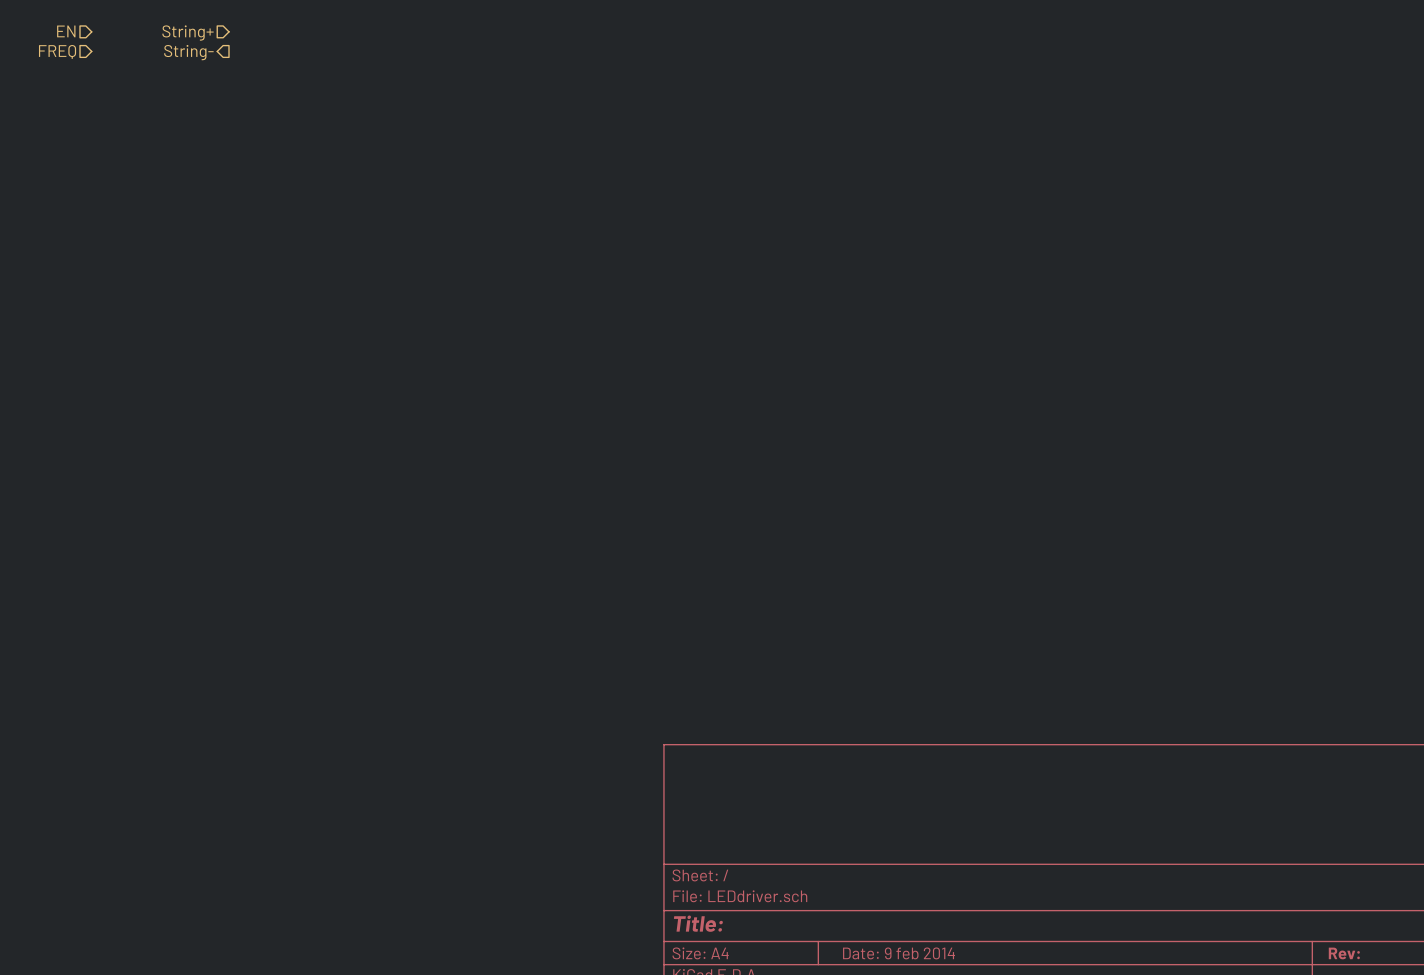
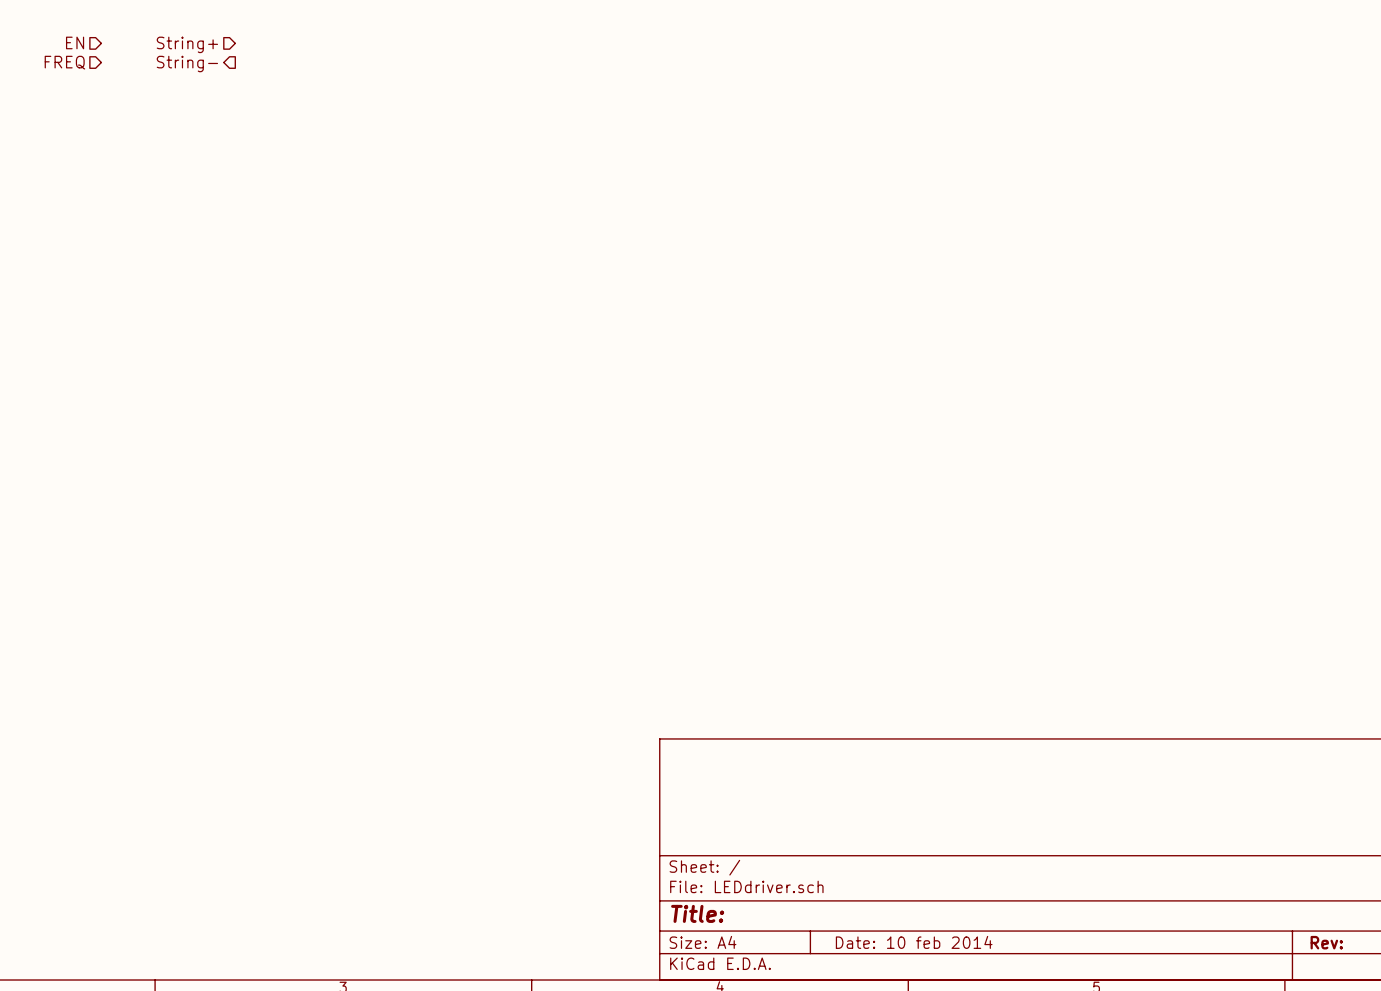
title block: Date: 9 feb 2014 (899, 953) -> Date: 10 feb 2014 (914, 942)

